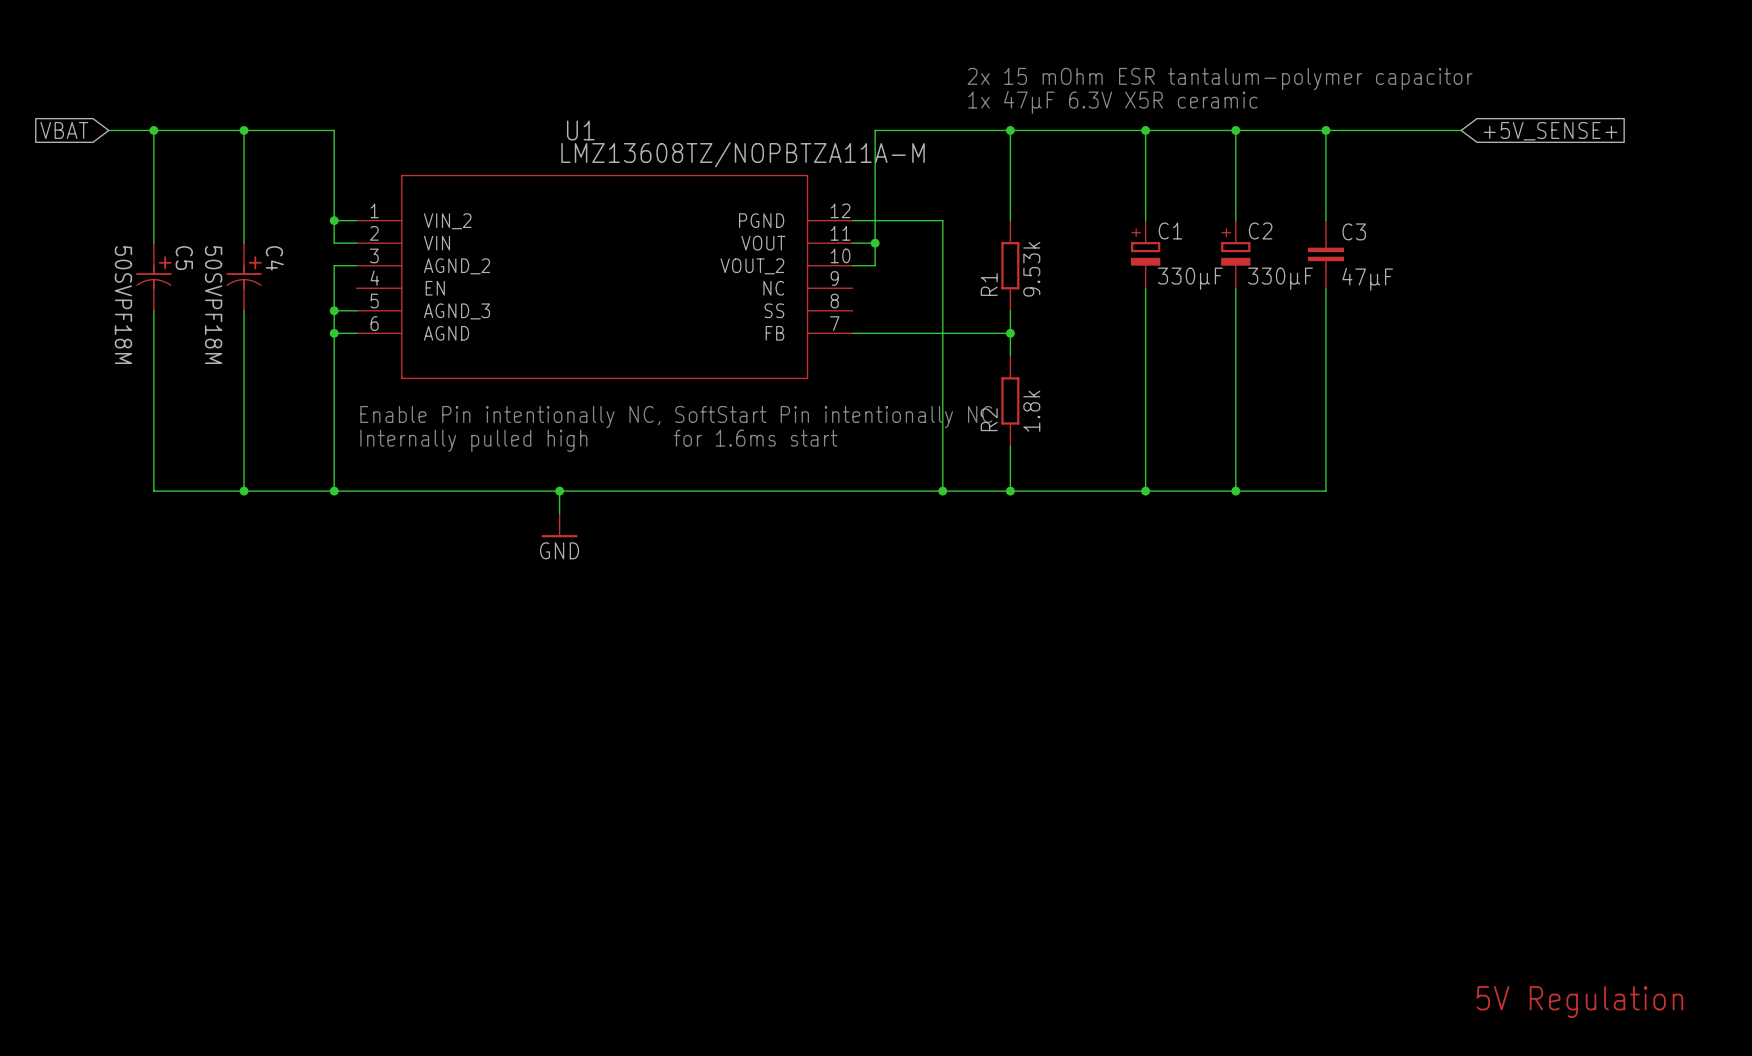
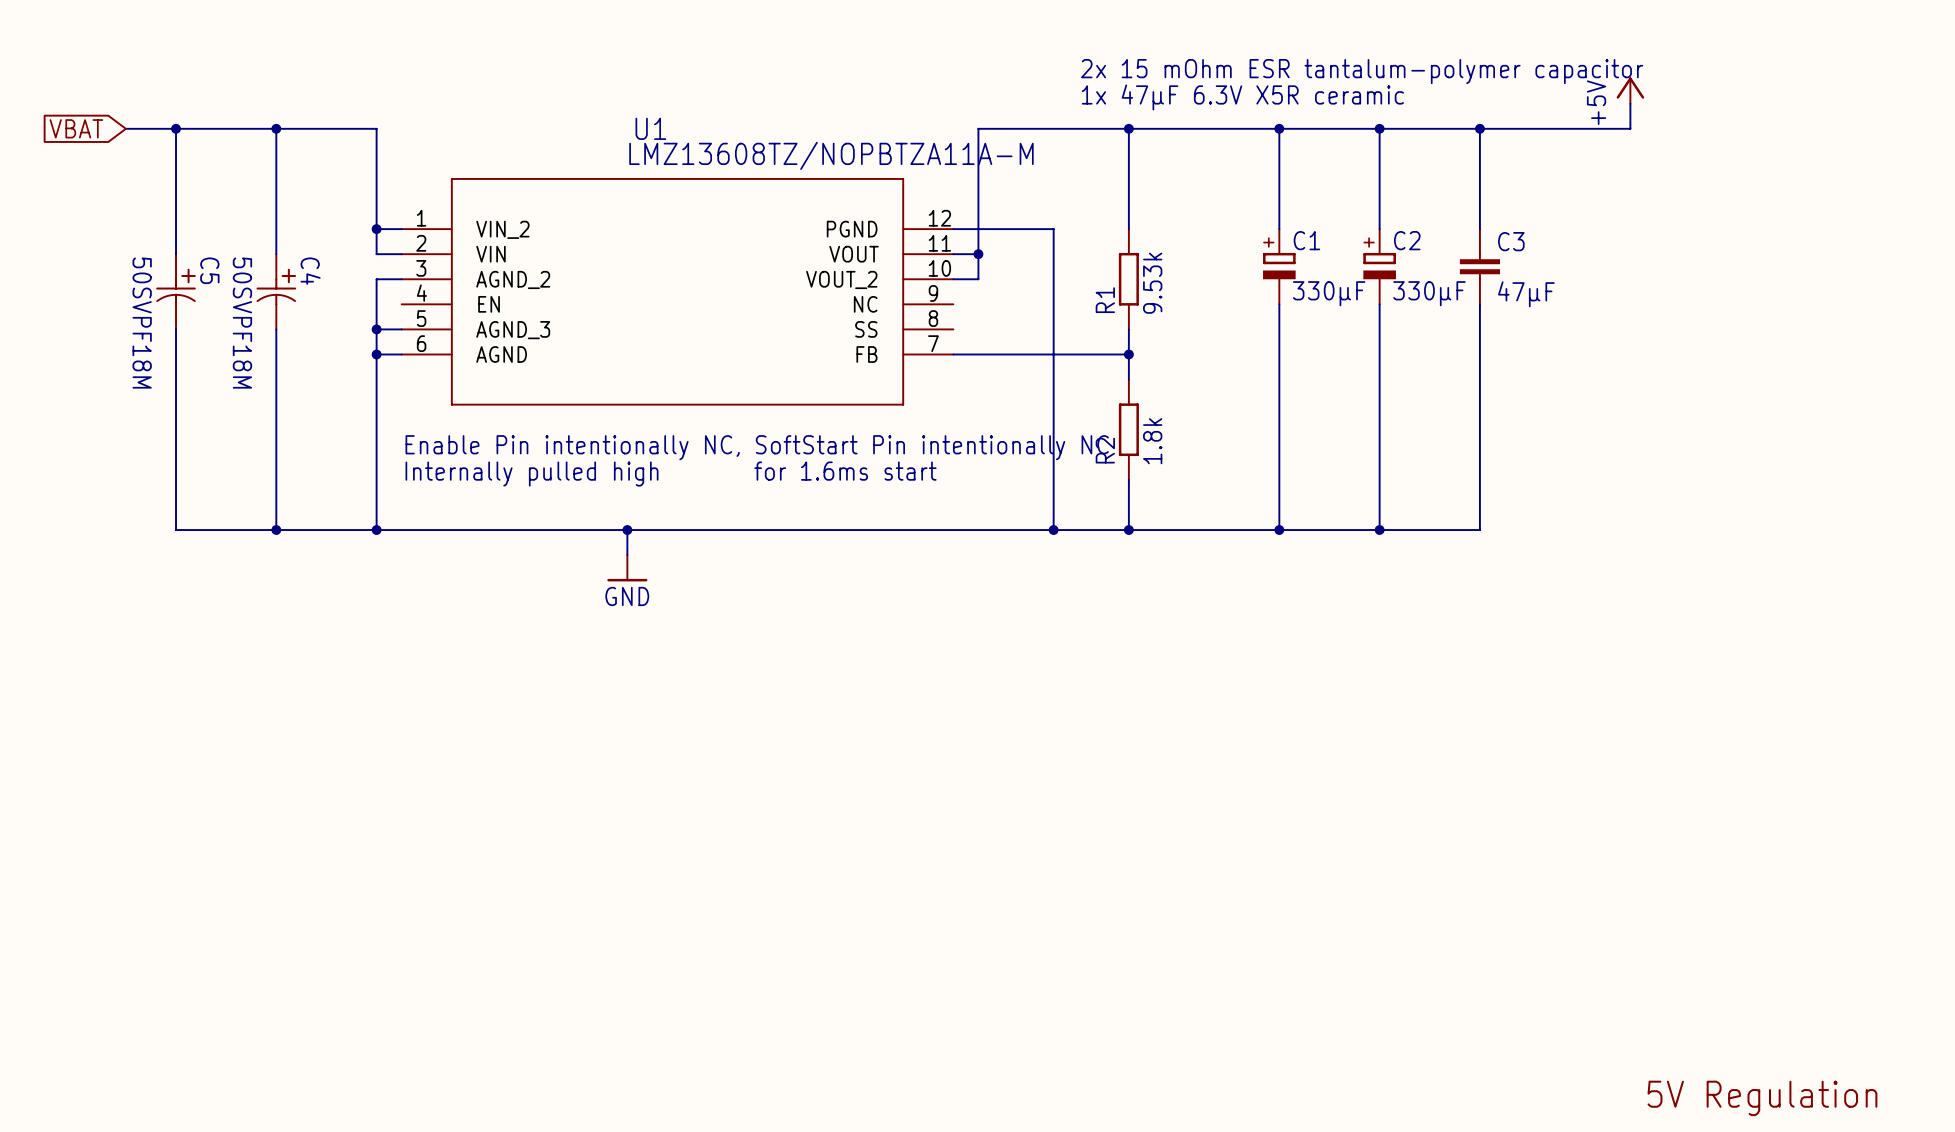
power symbol: none -> +5V (1630, 90)
wire: none -> (1630, 103) (1630, 128)
global label: +5V_SENSE+ (1550, 131) -> none

